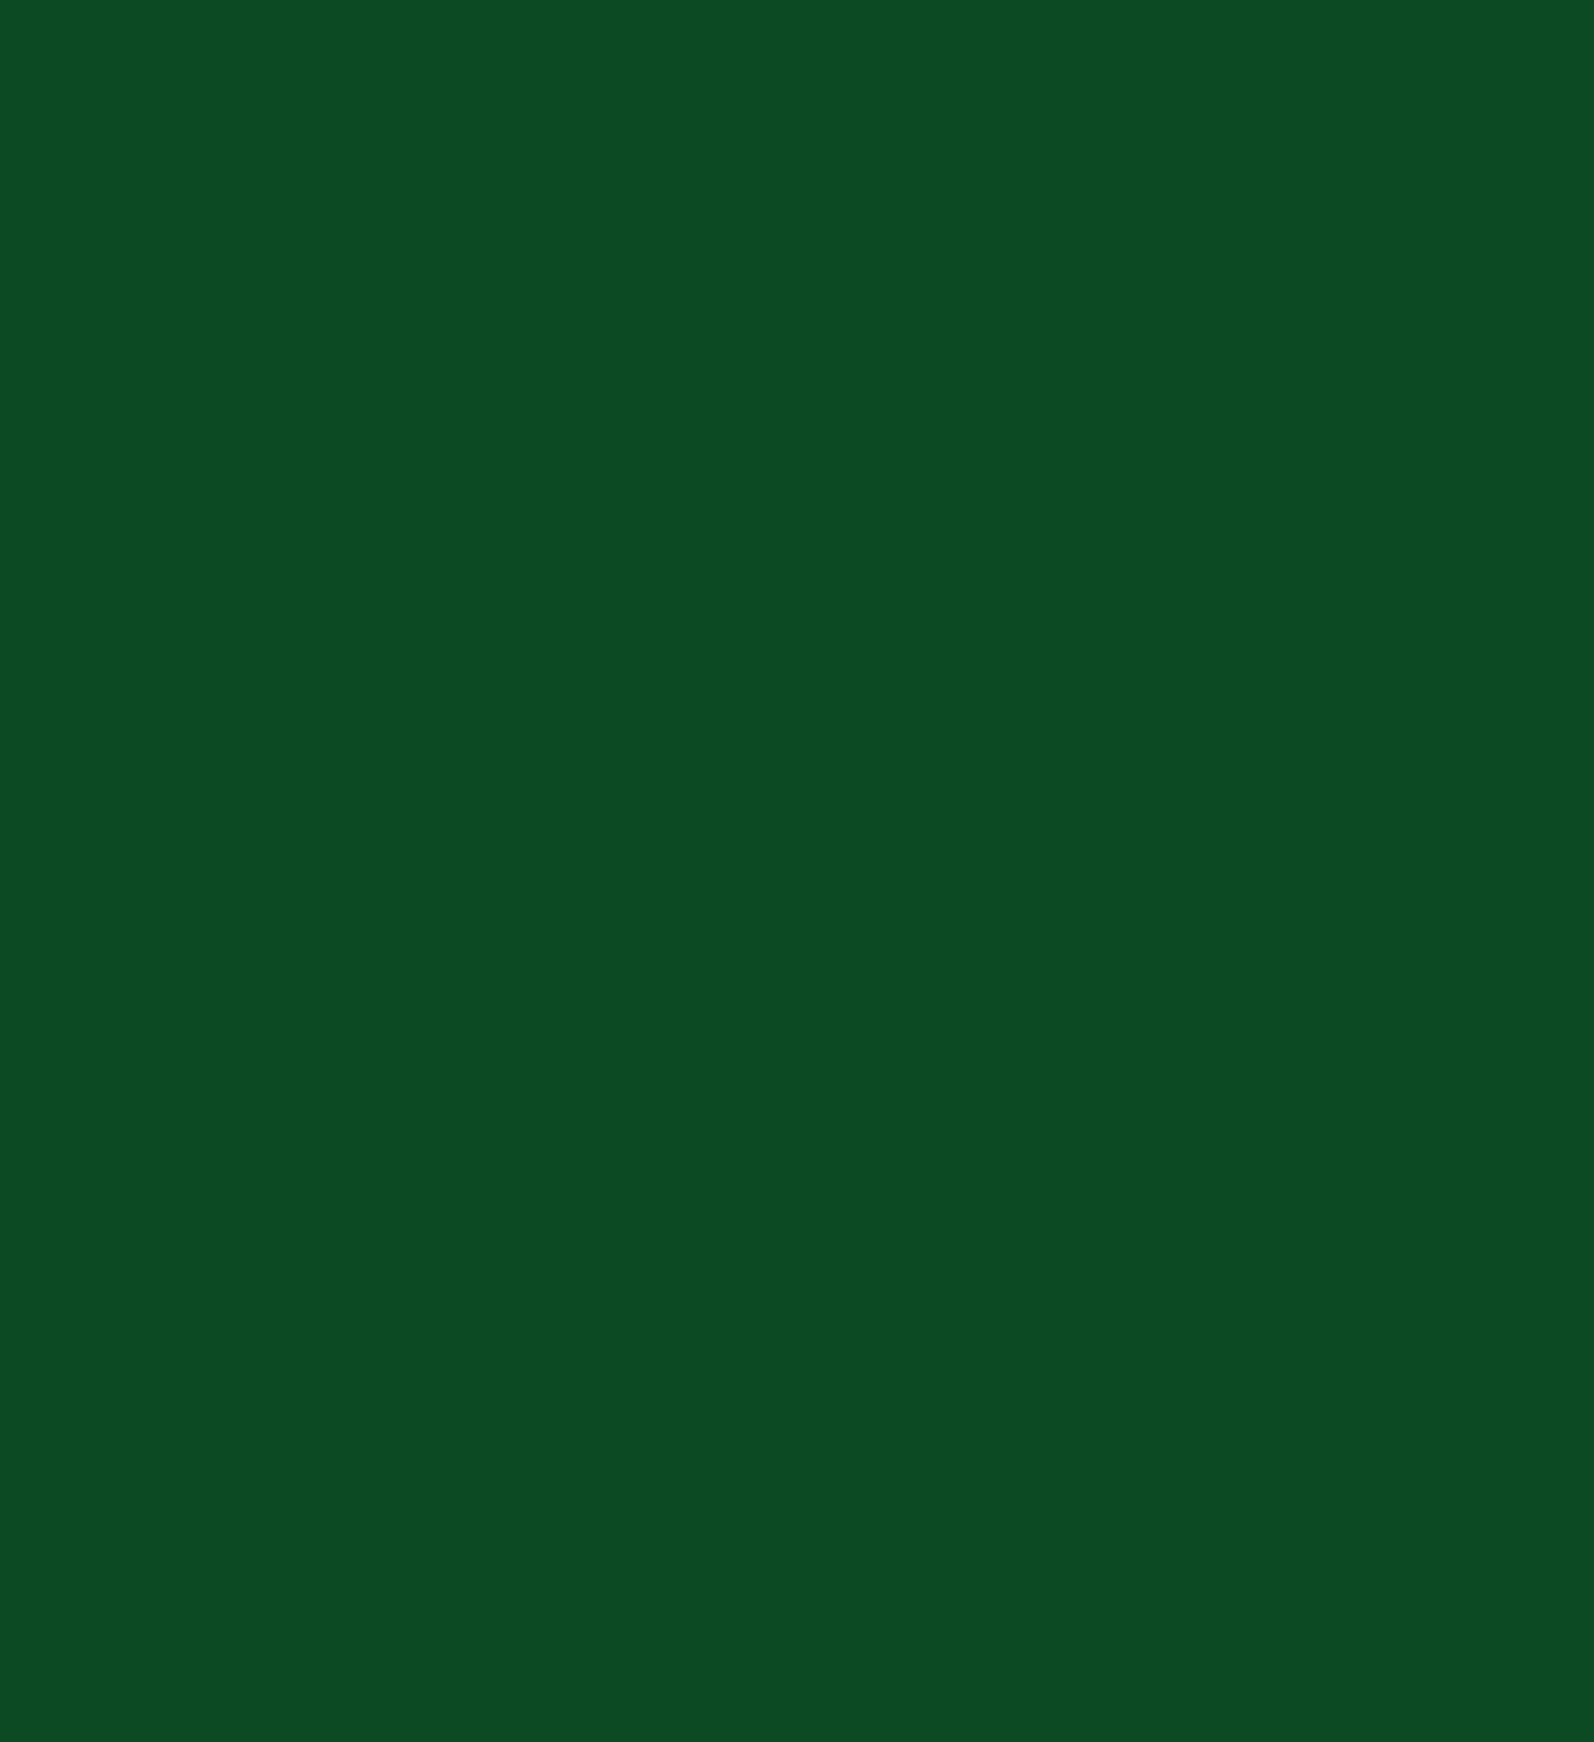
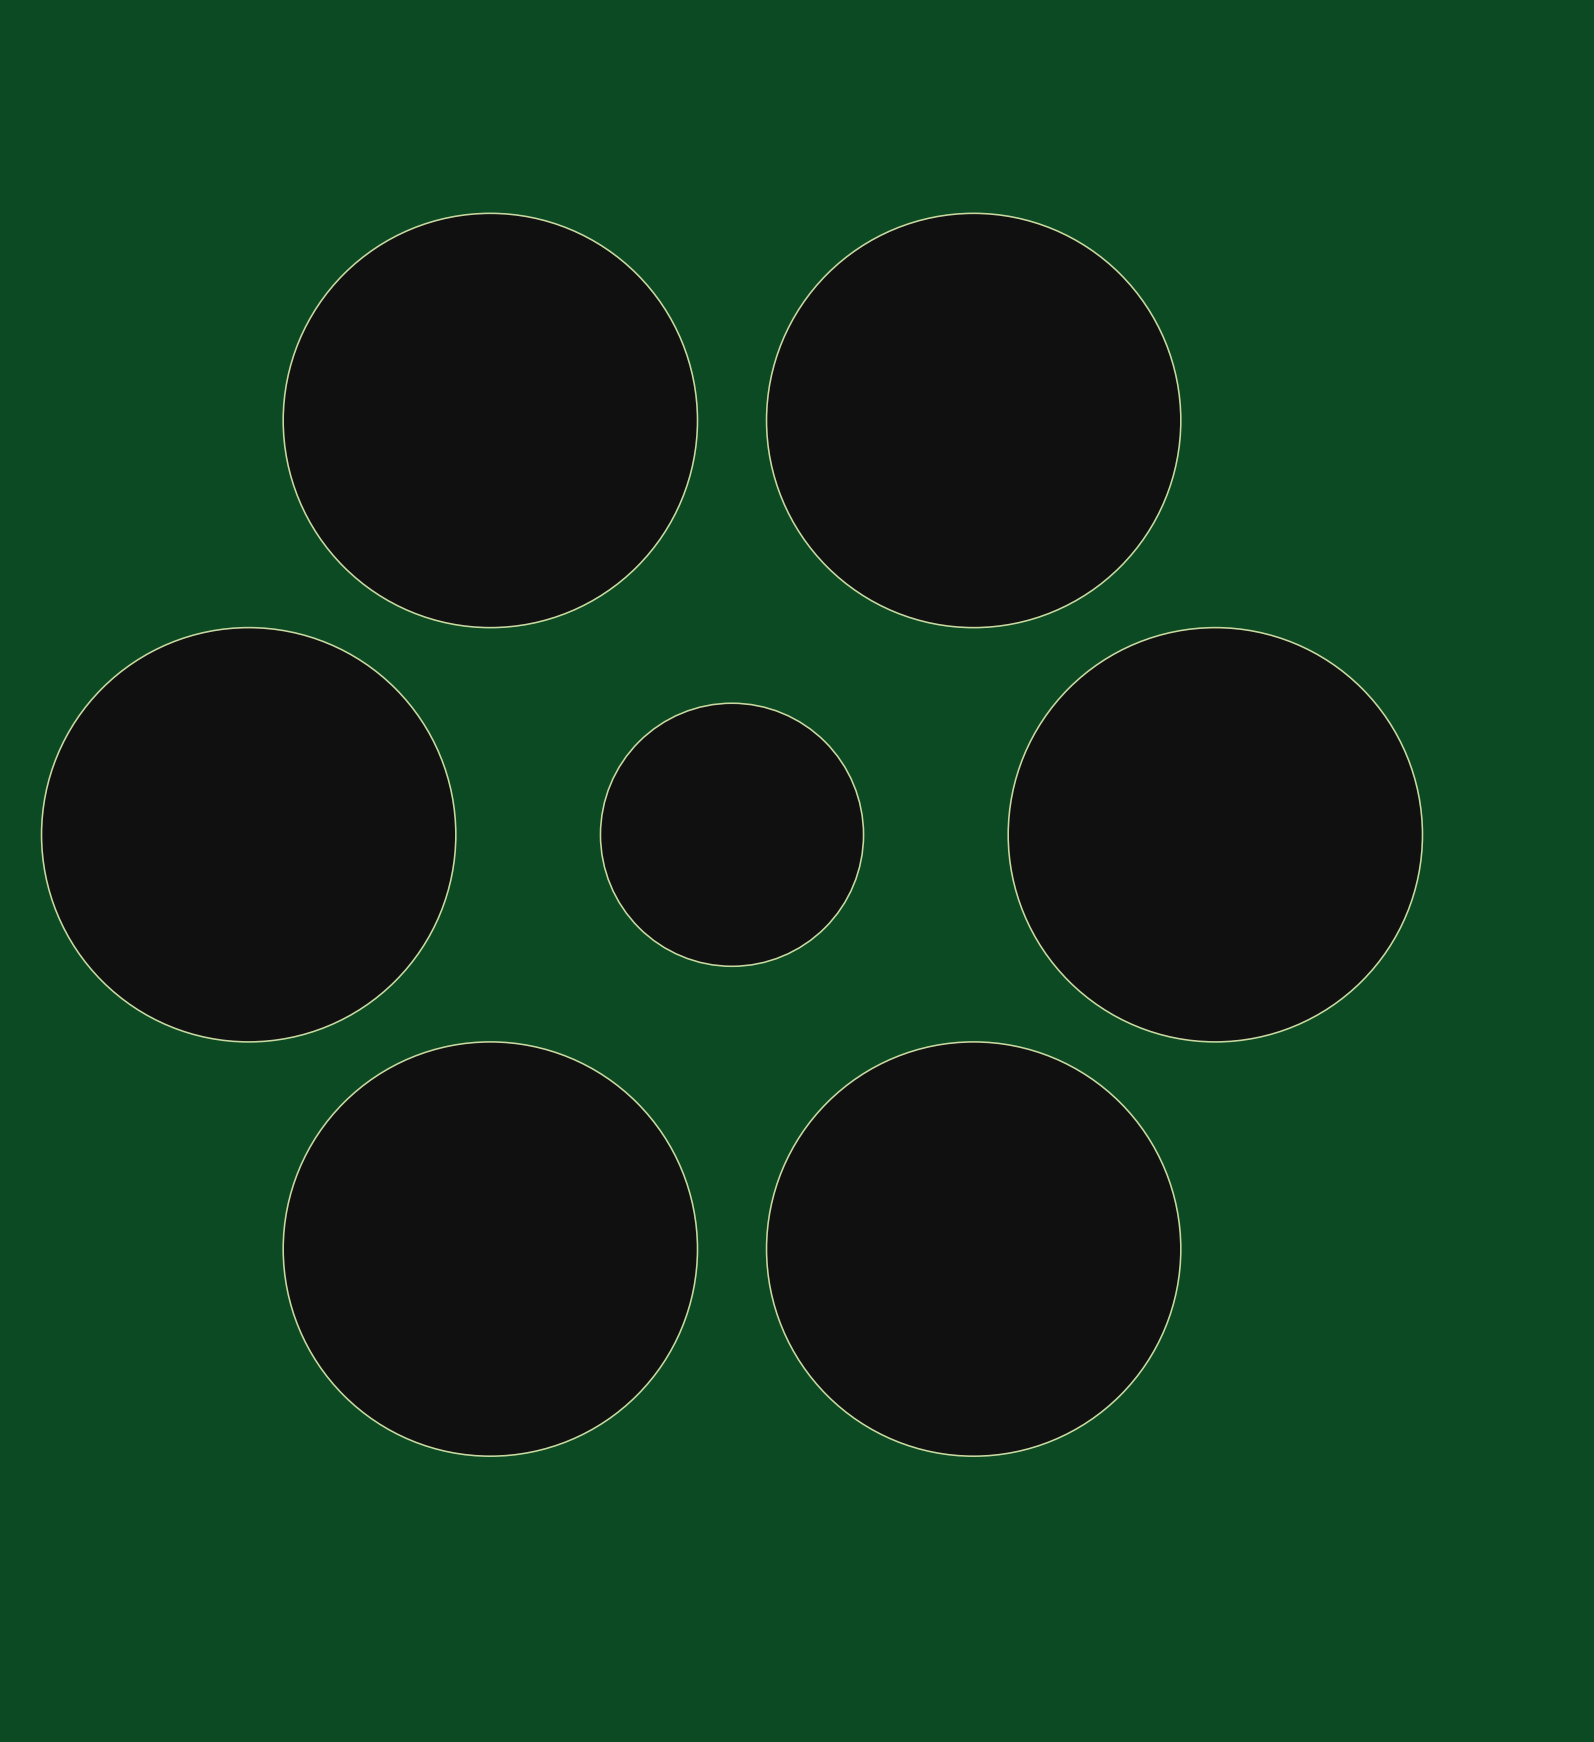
part: none -> (732, 834)

